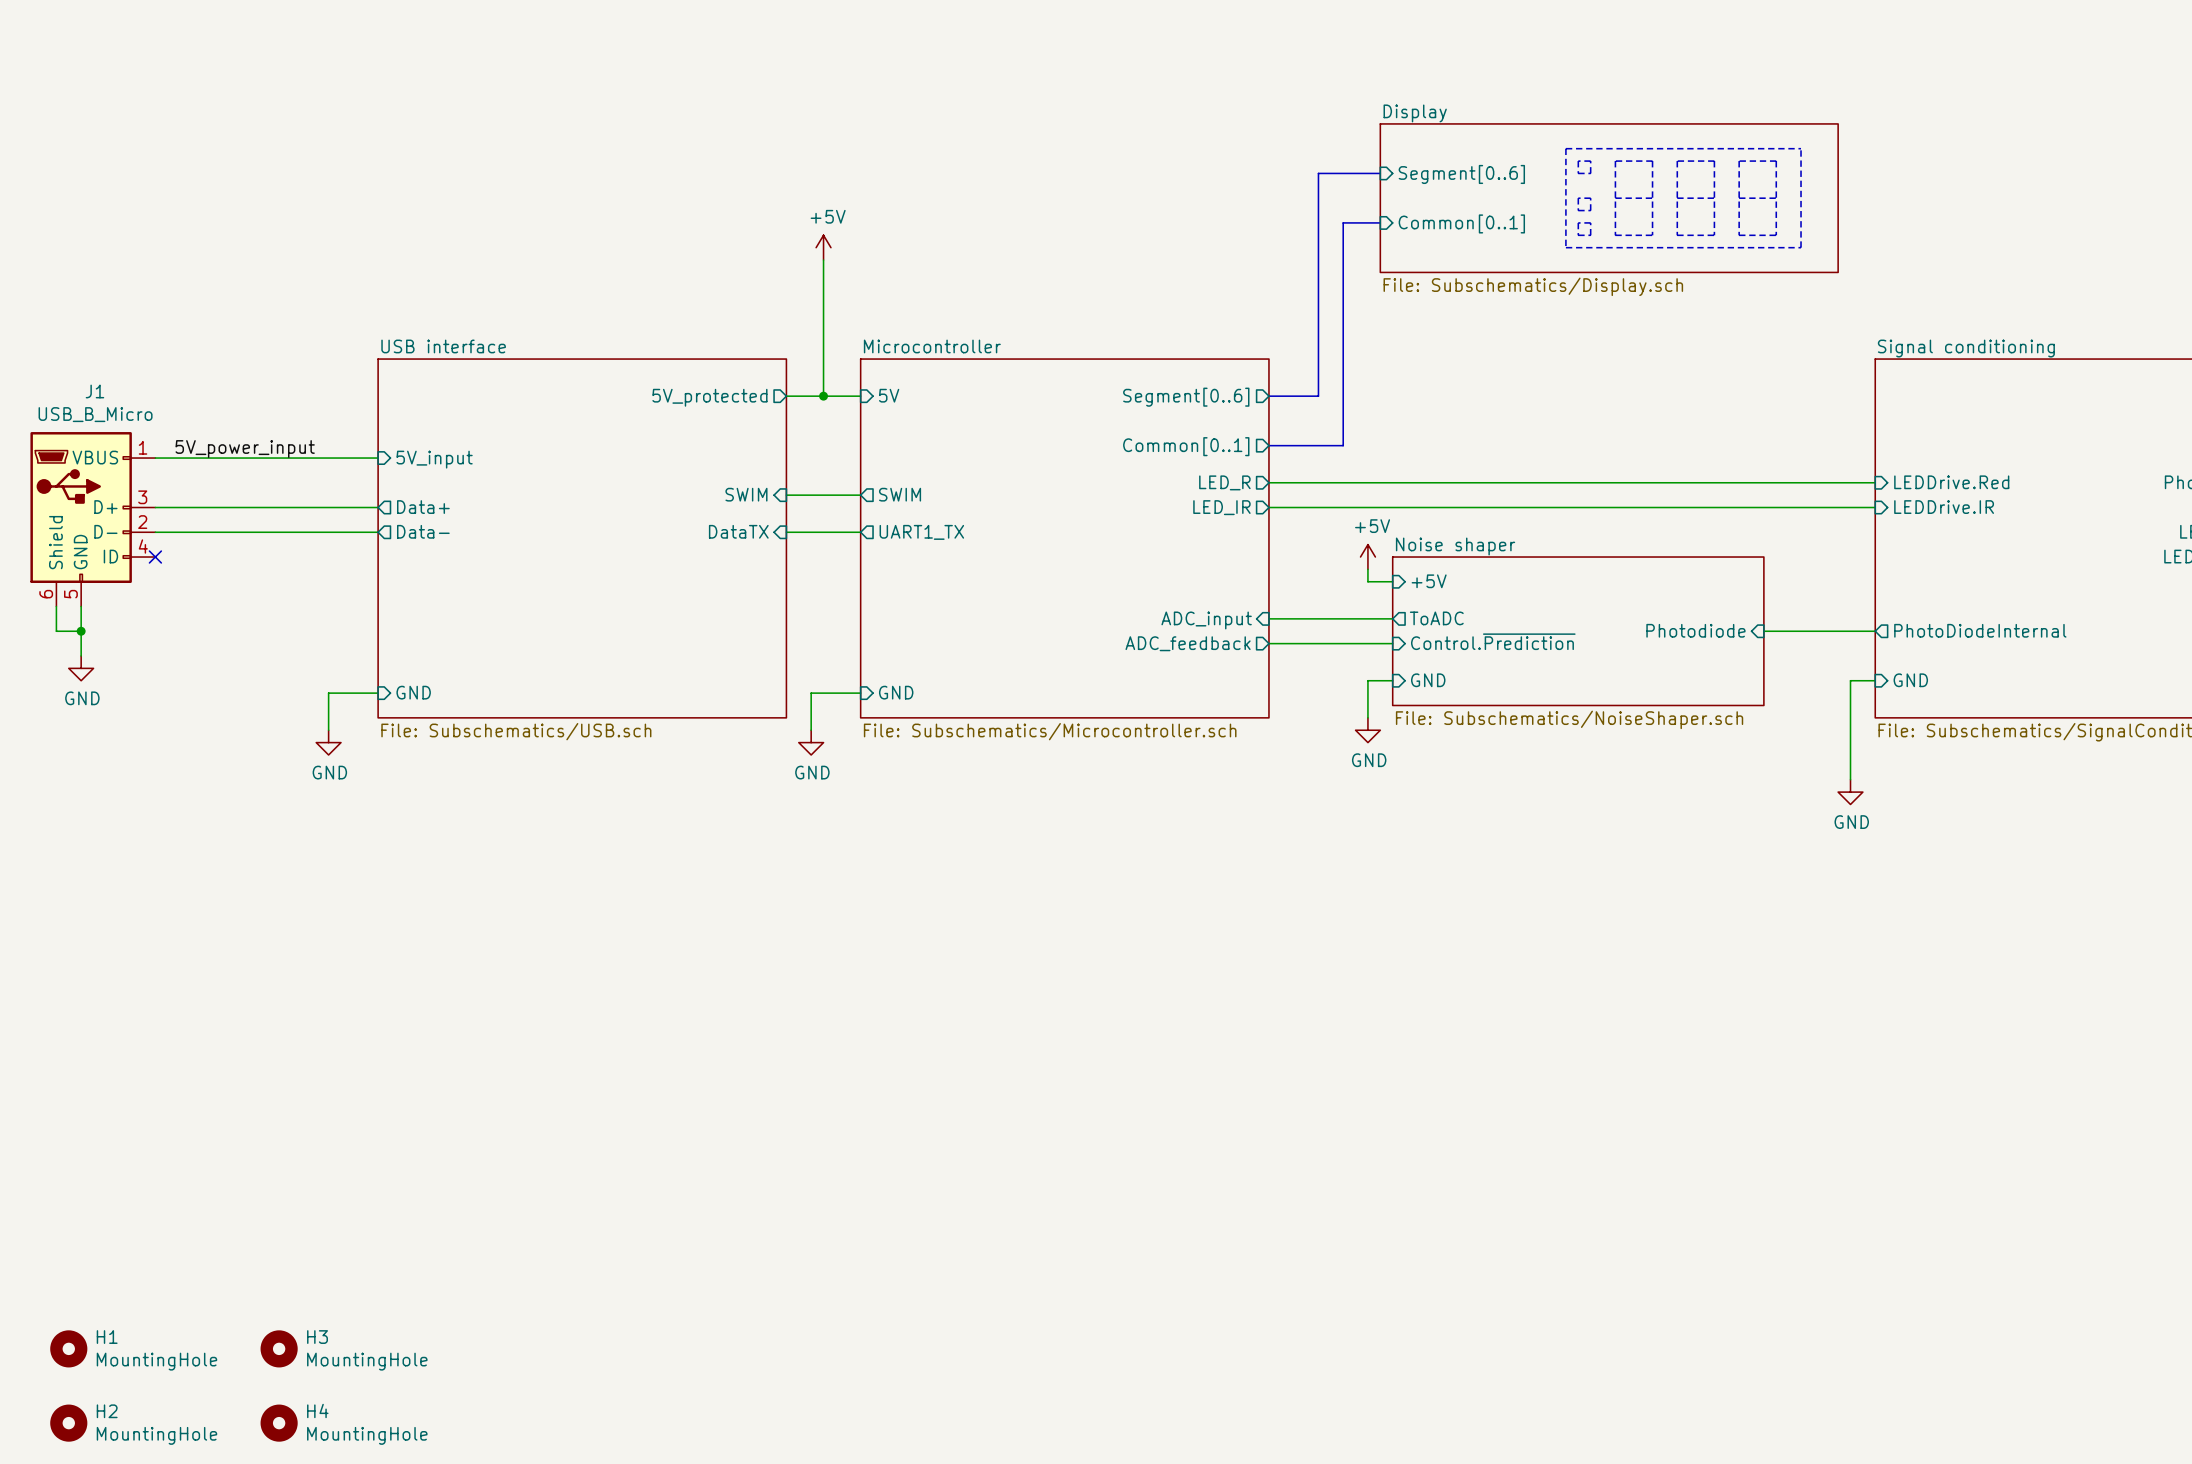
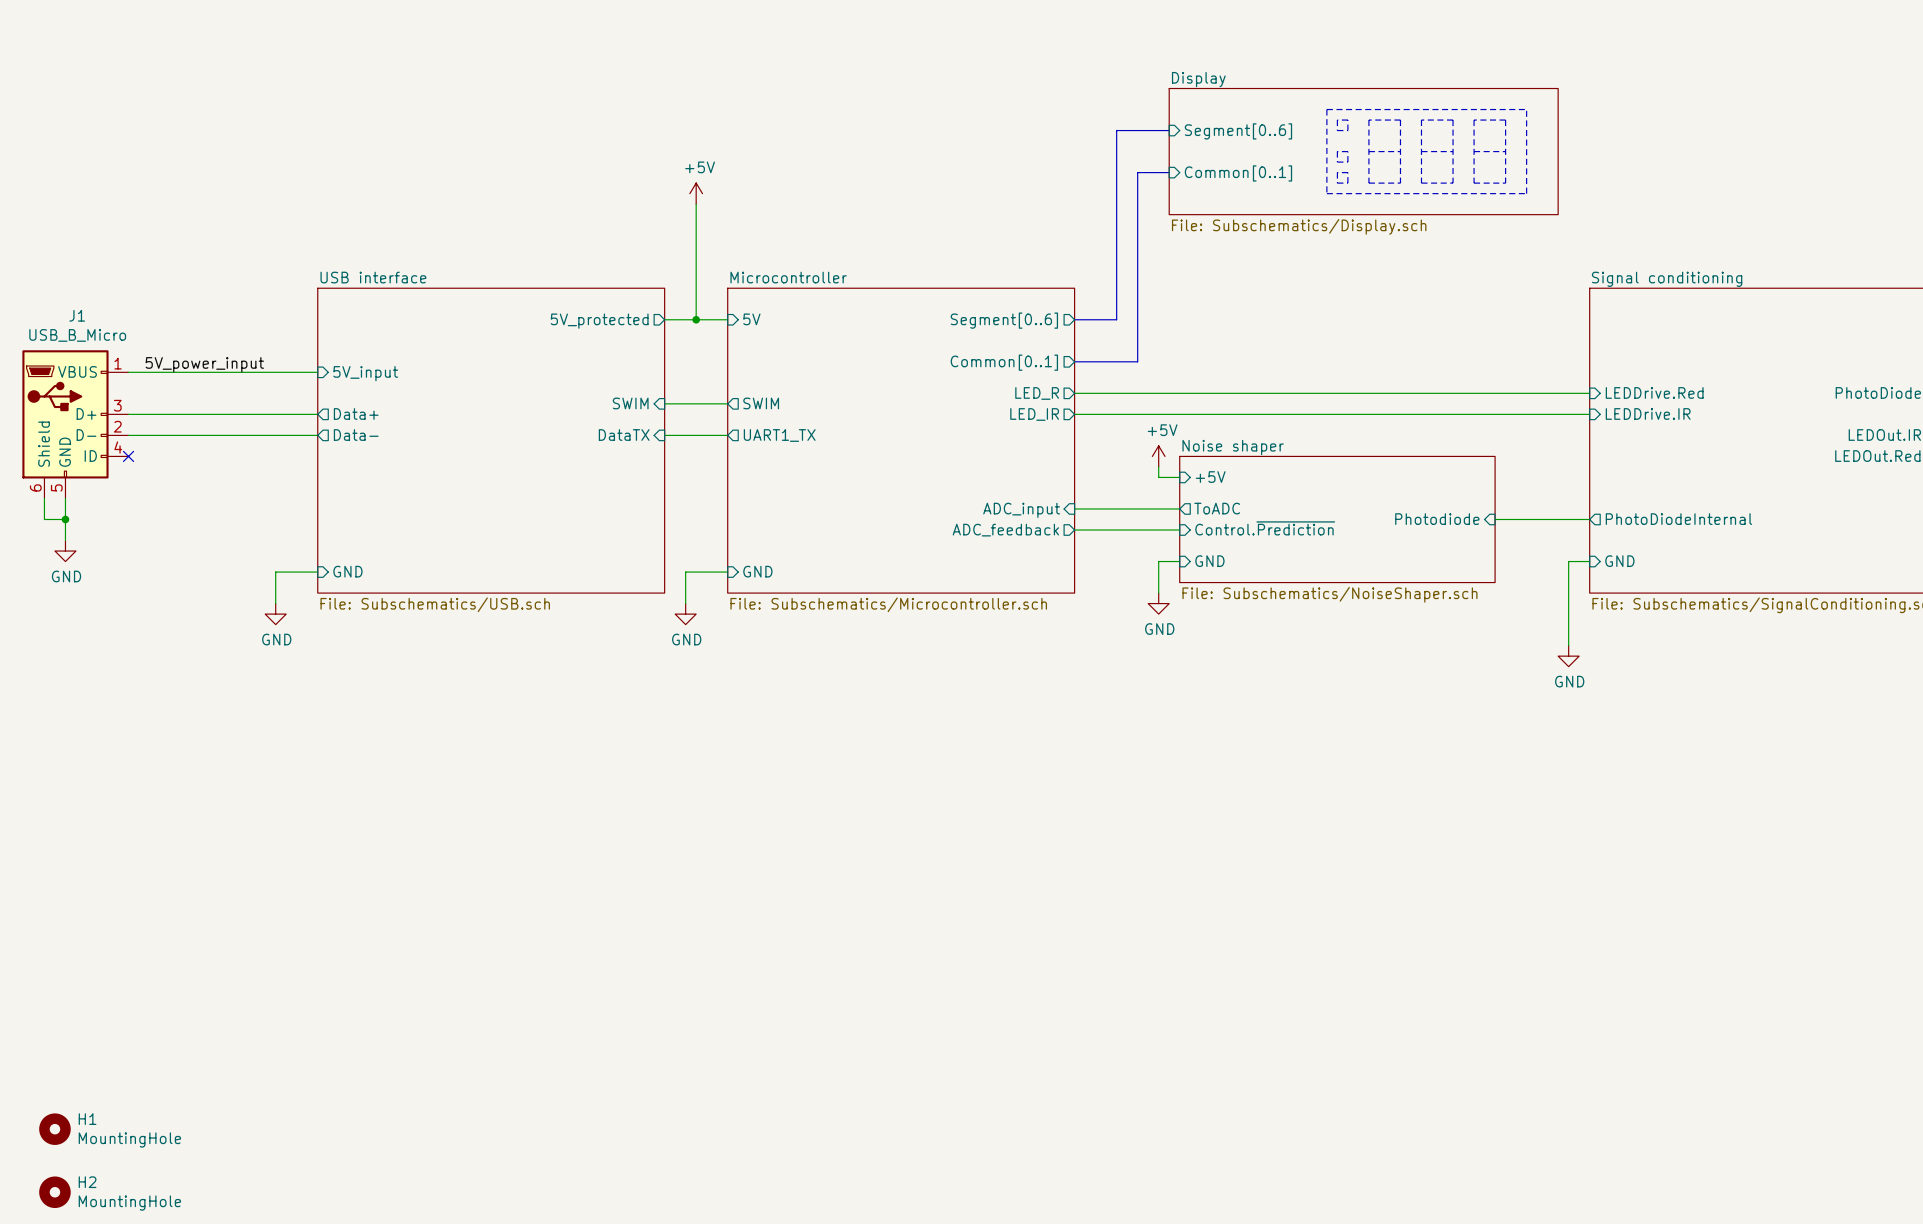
H3: MountingHole (279, 1348) -> none
H4: MountingHole (279, 1423) -> none

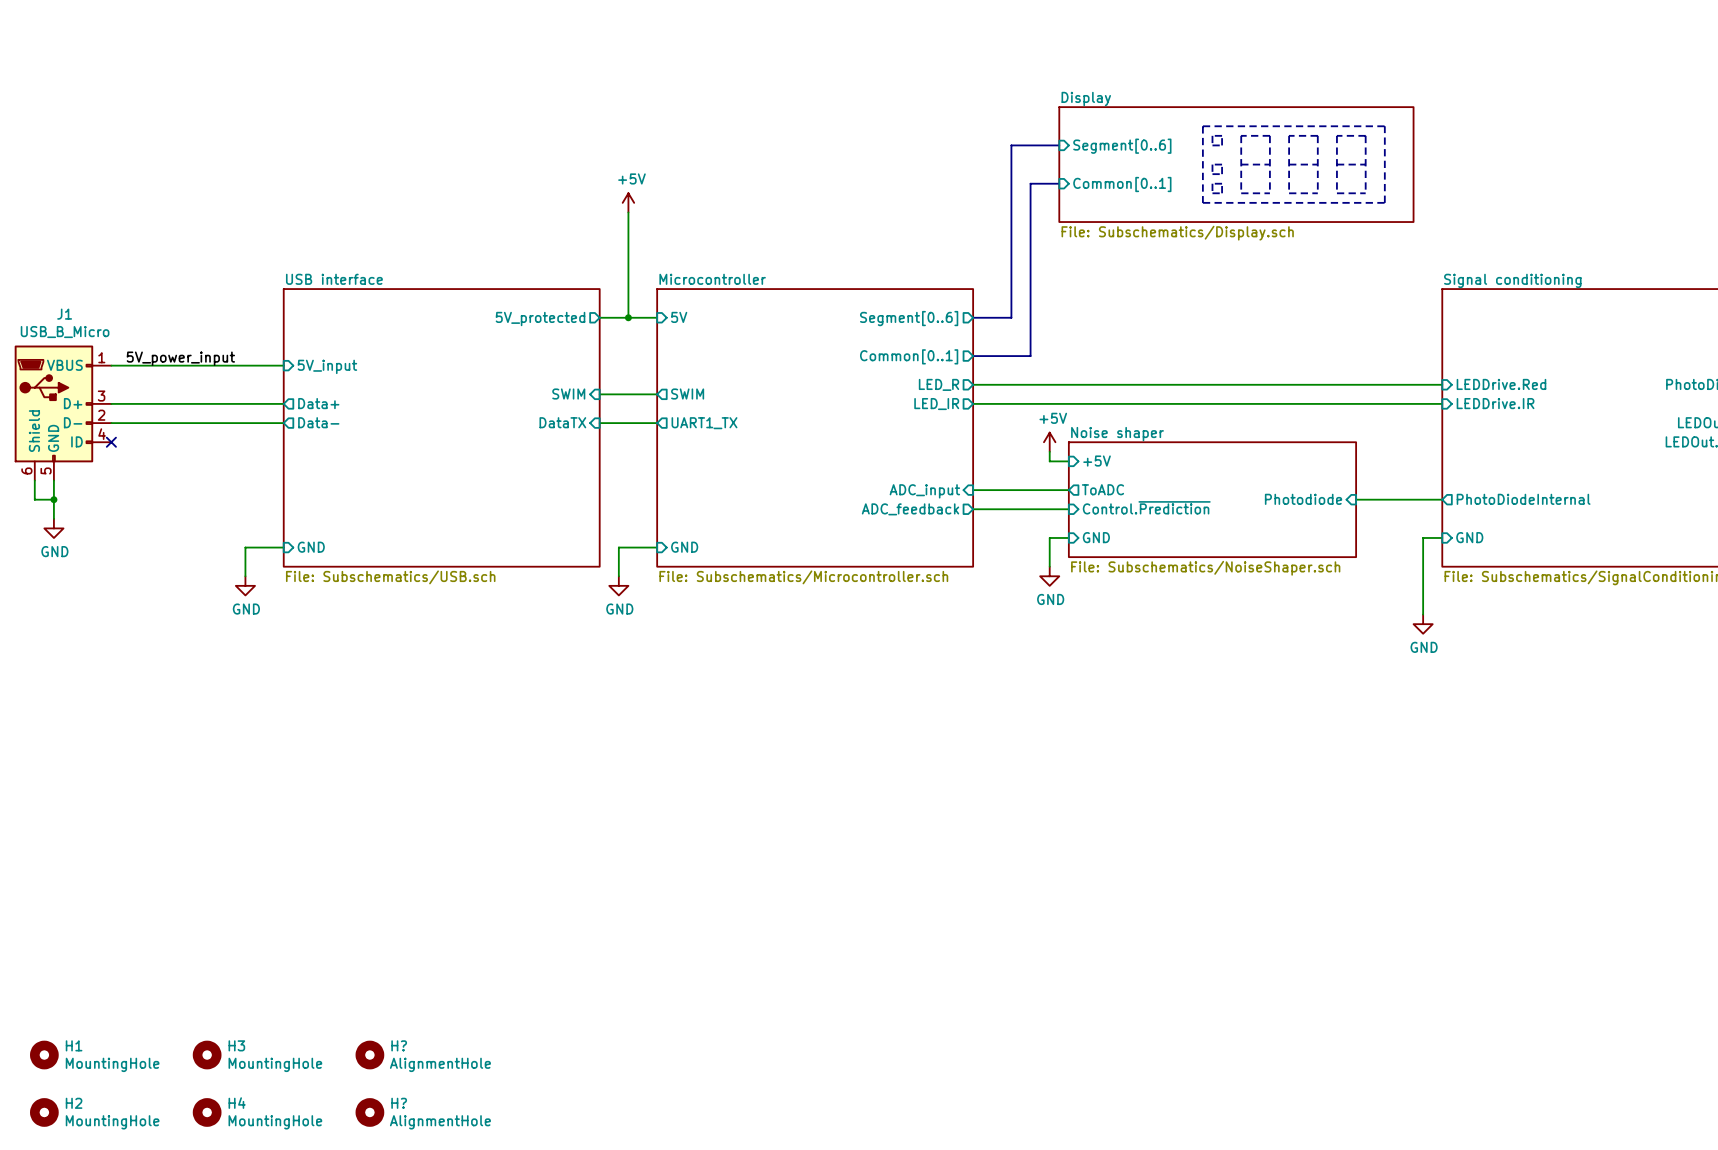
H3: none -> MountingHole (207, 1055)
H?: none -> AlignmentHole (369, 1055)
H4: none -> MountingHole (207, 1112)
H?: none -> AlignmentHole (369, 1112)

